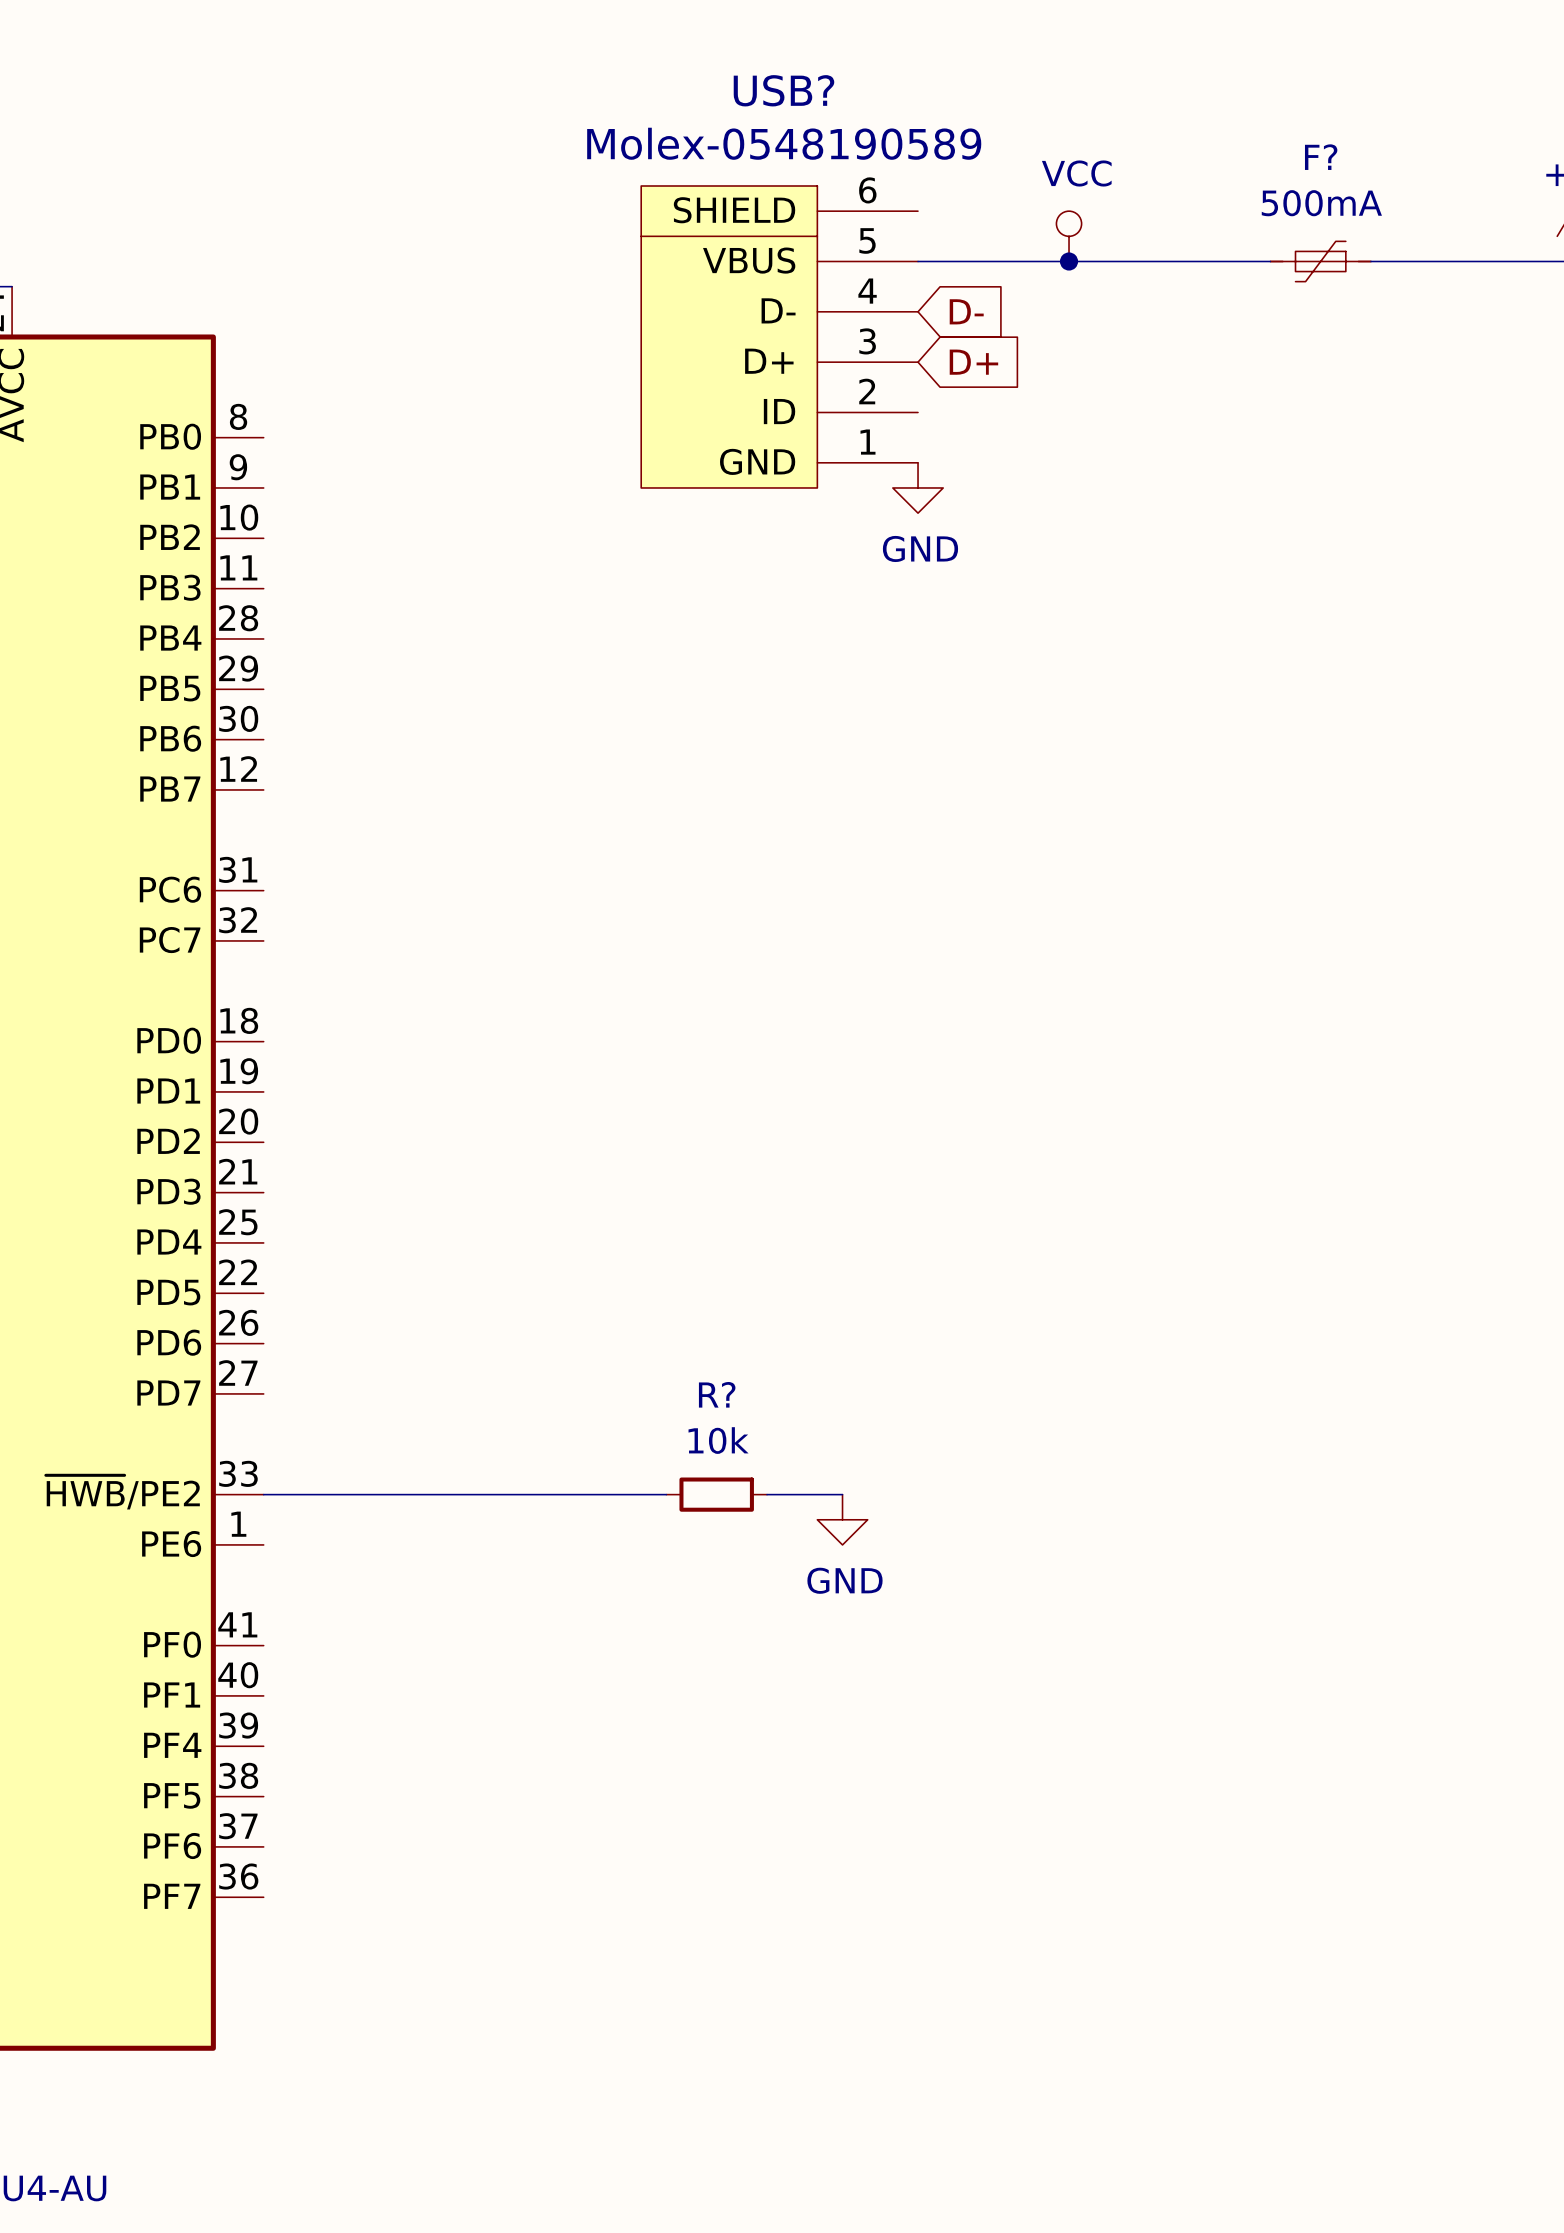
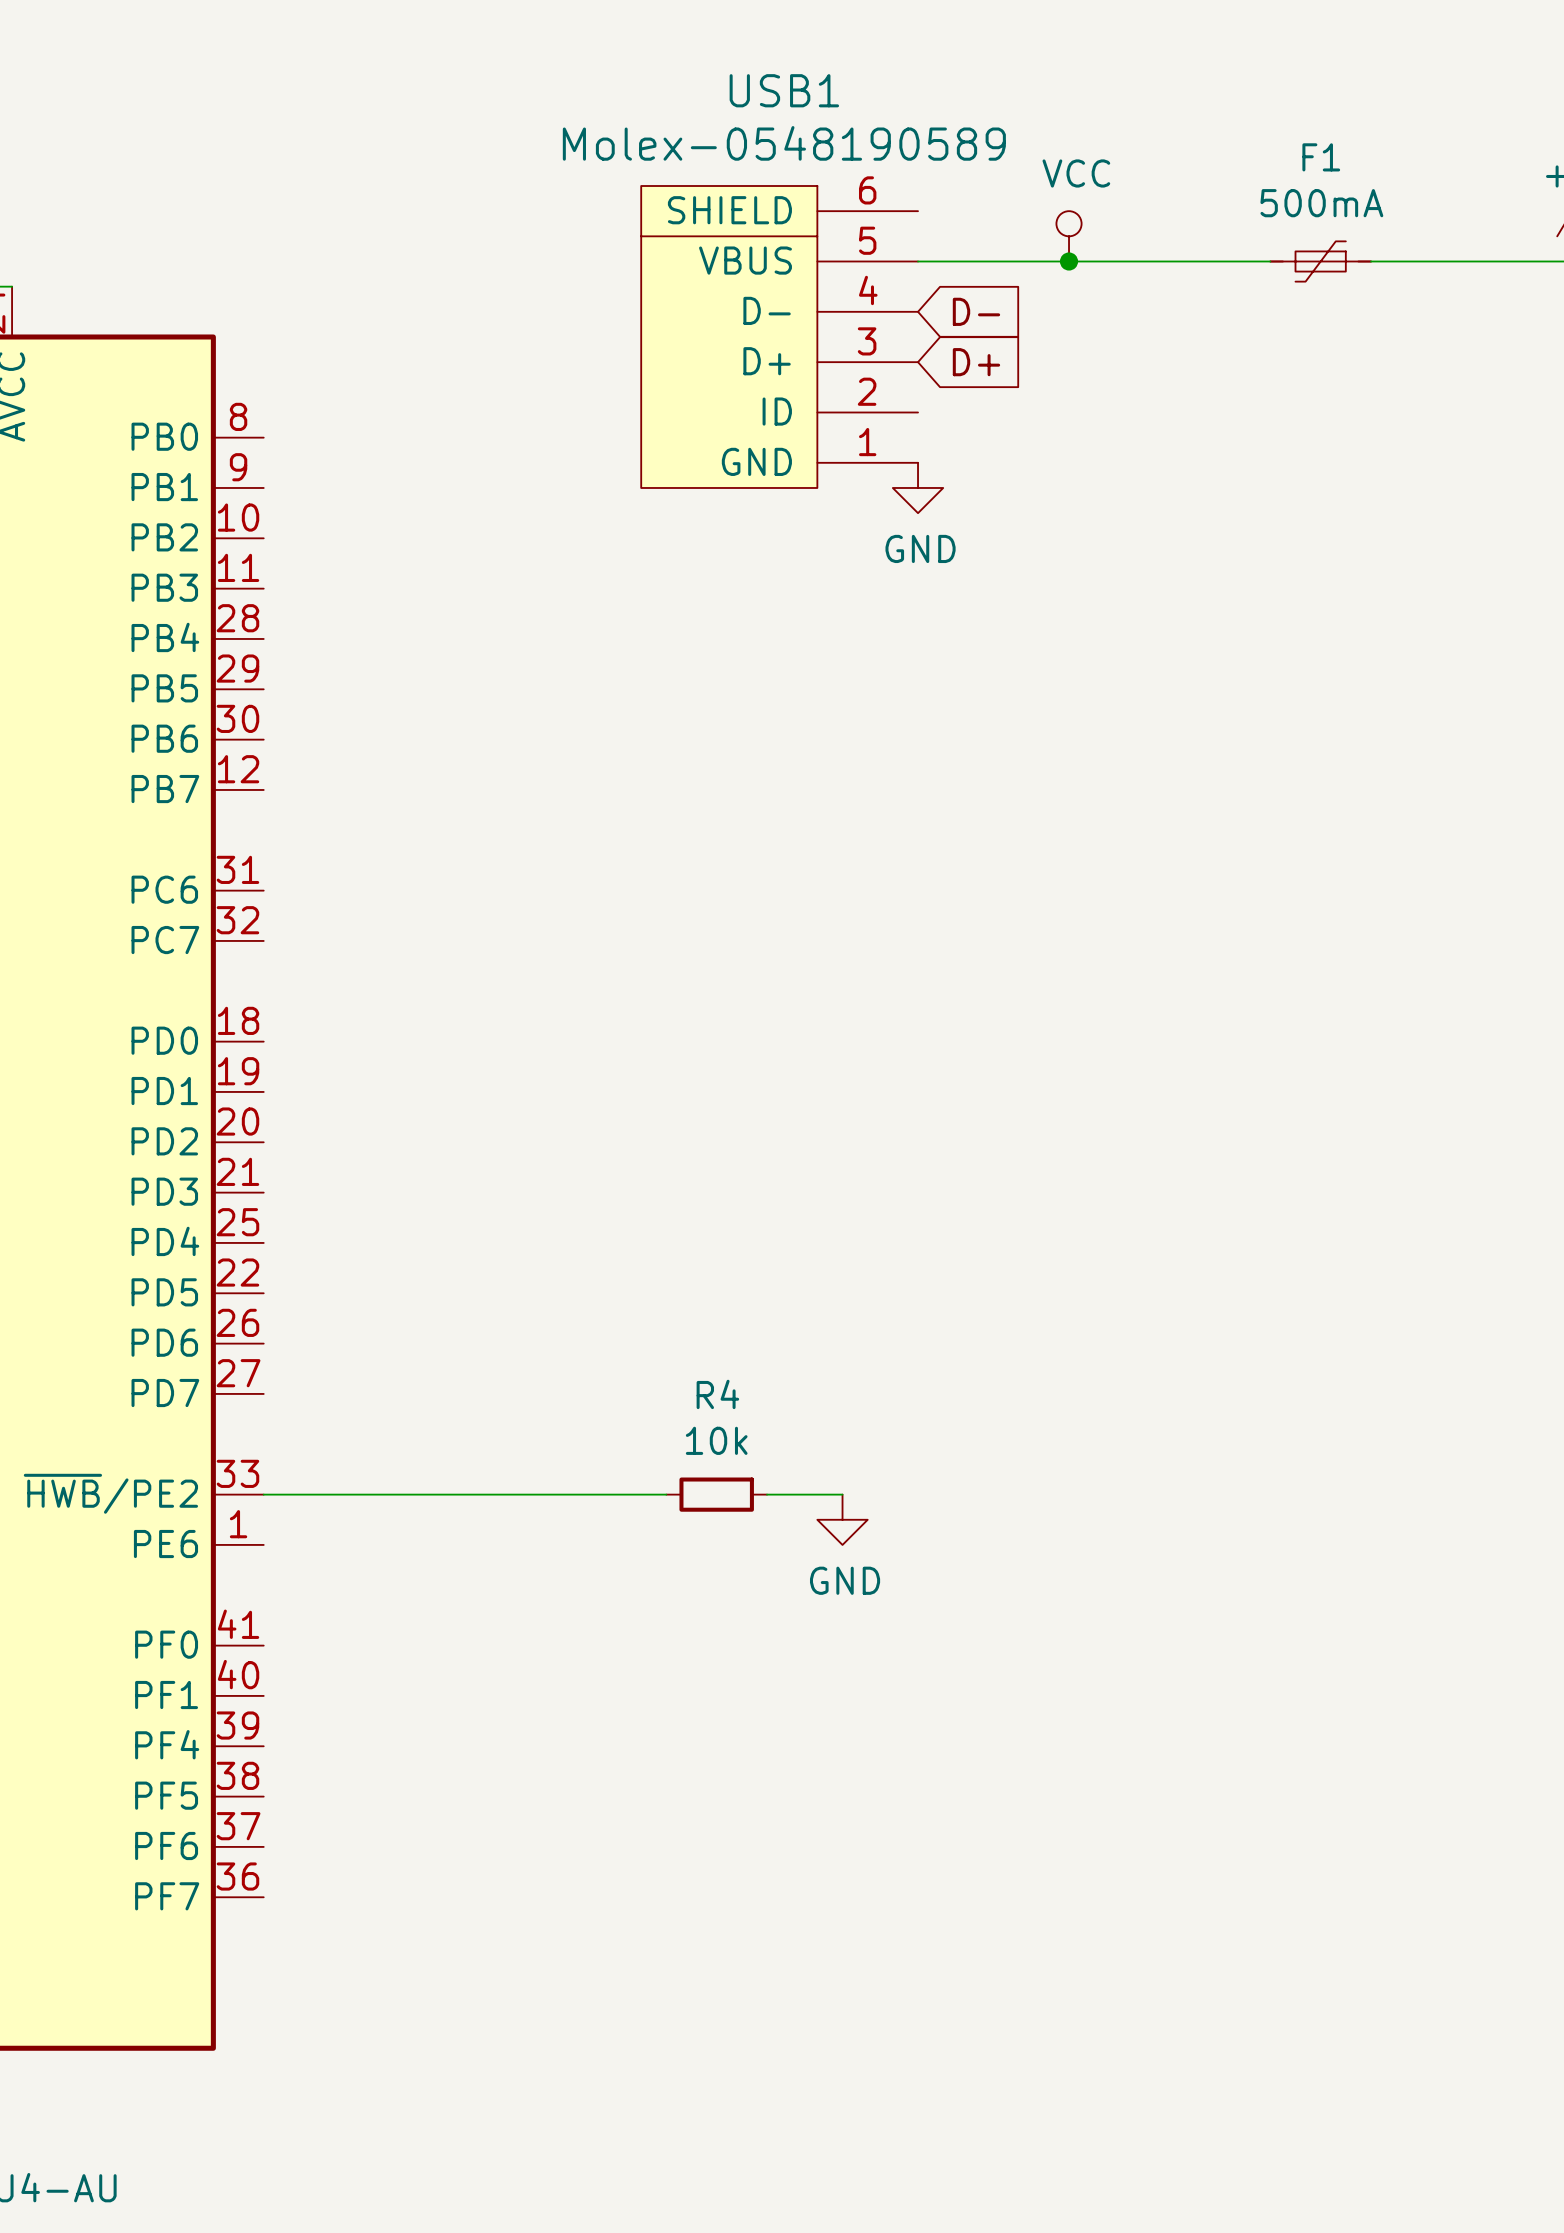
USB? name: USB? (783, 90) -> USB1 (784, 90)
F? name: F? (1321, 157) -> F1 (1321, 157)
R? name: R? (717, 1394) -> R4 (717, 1394)

